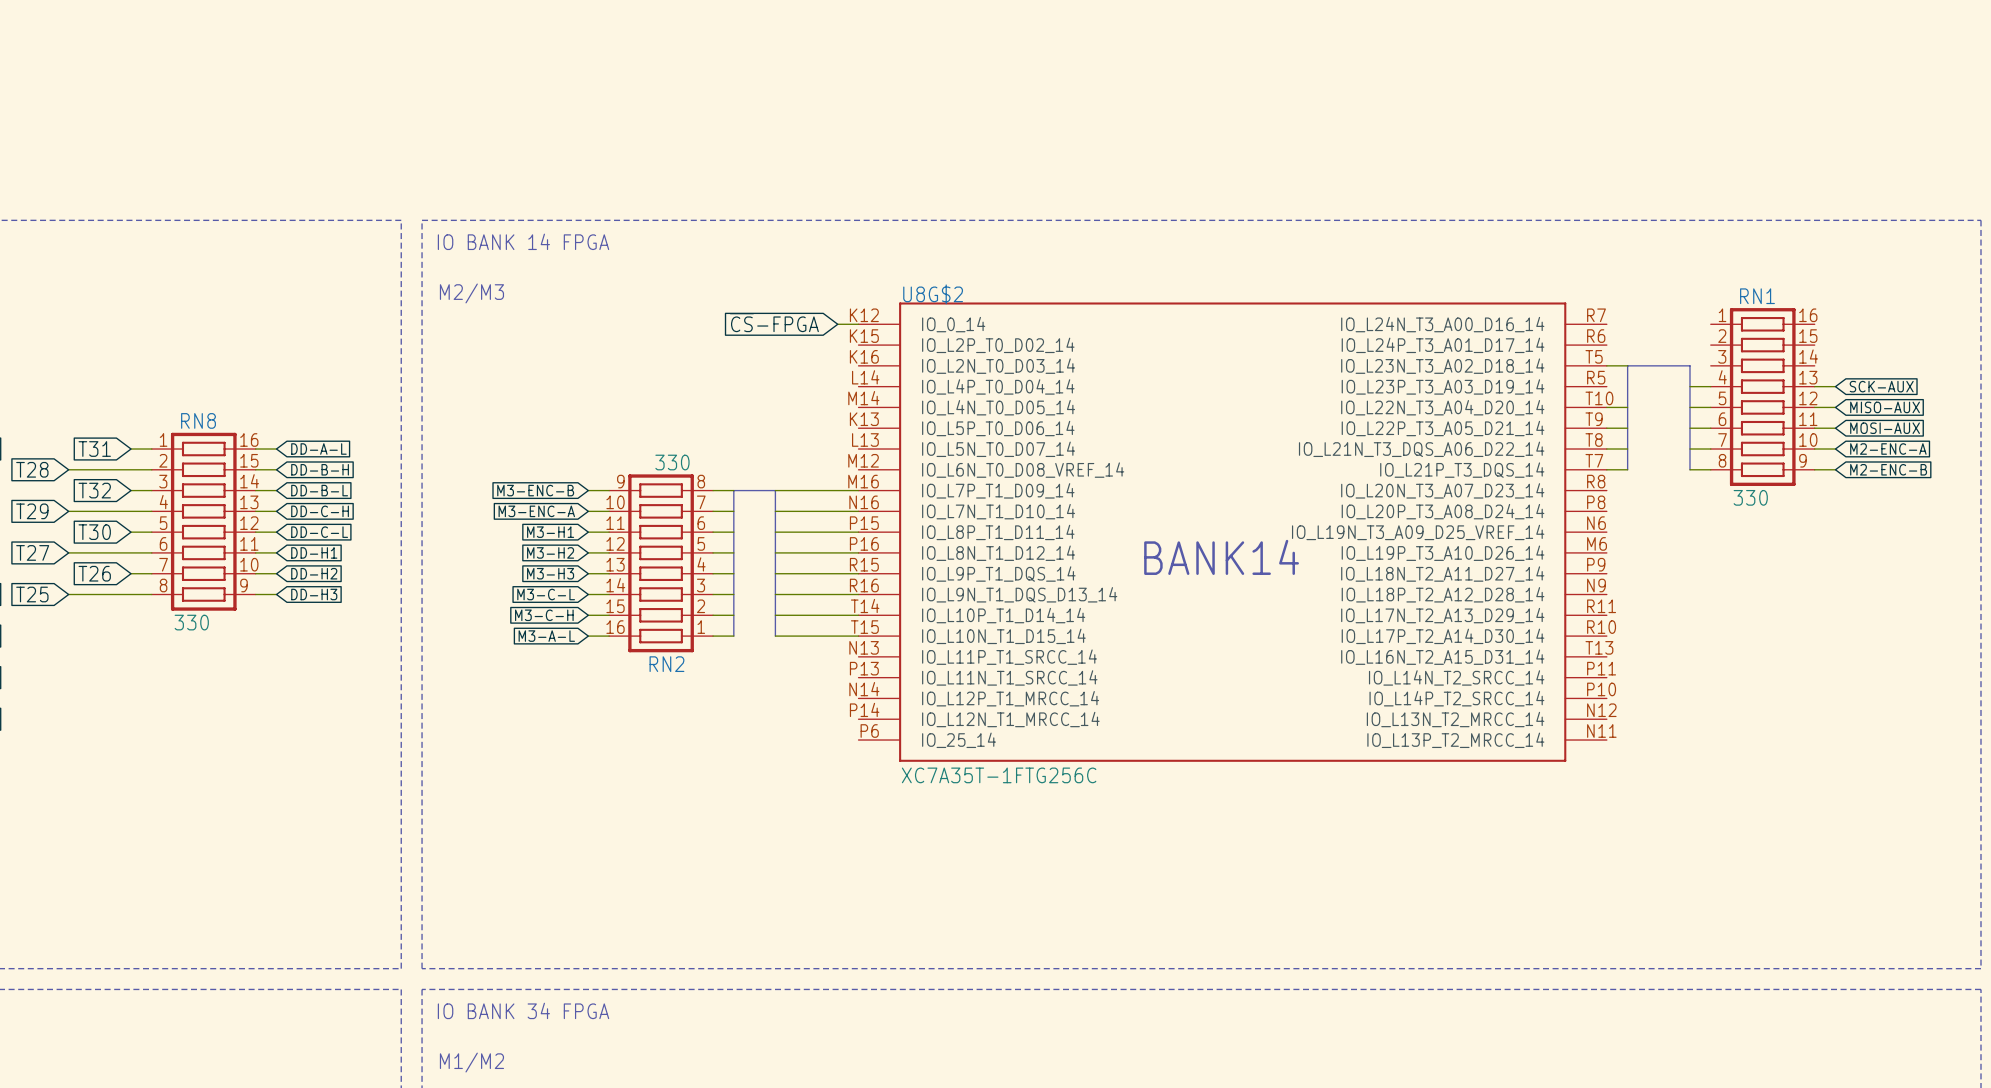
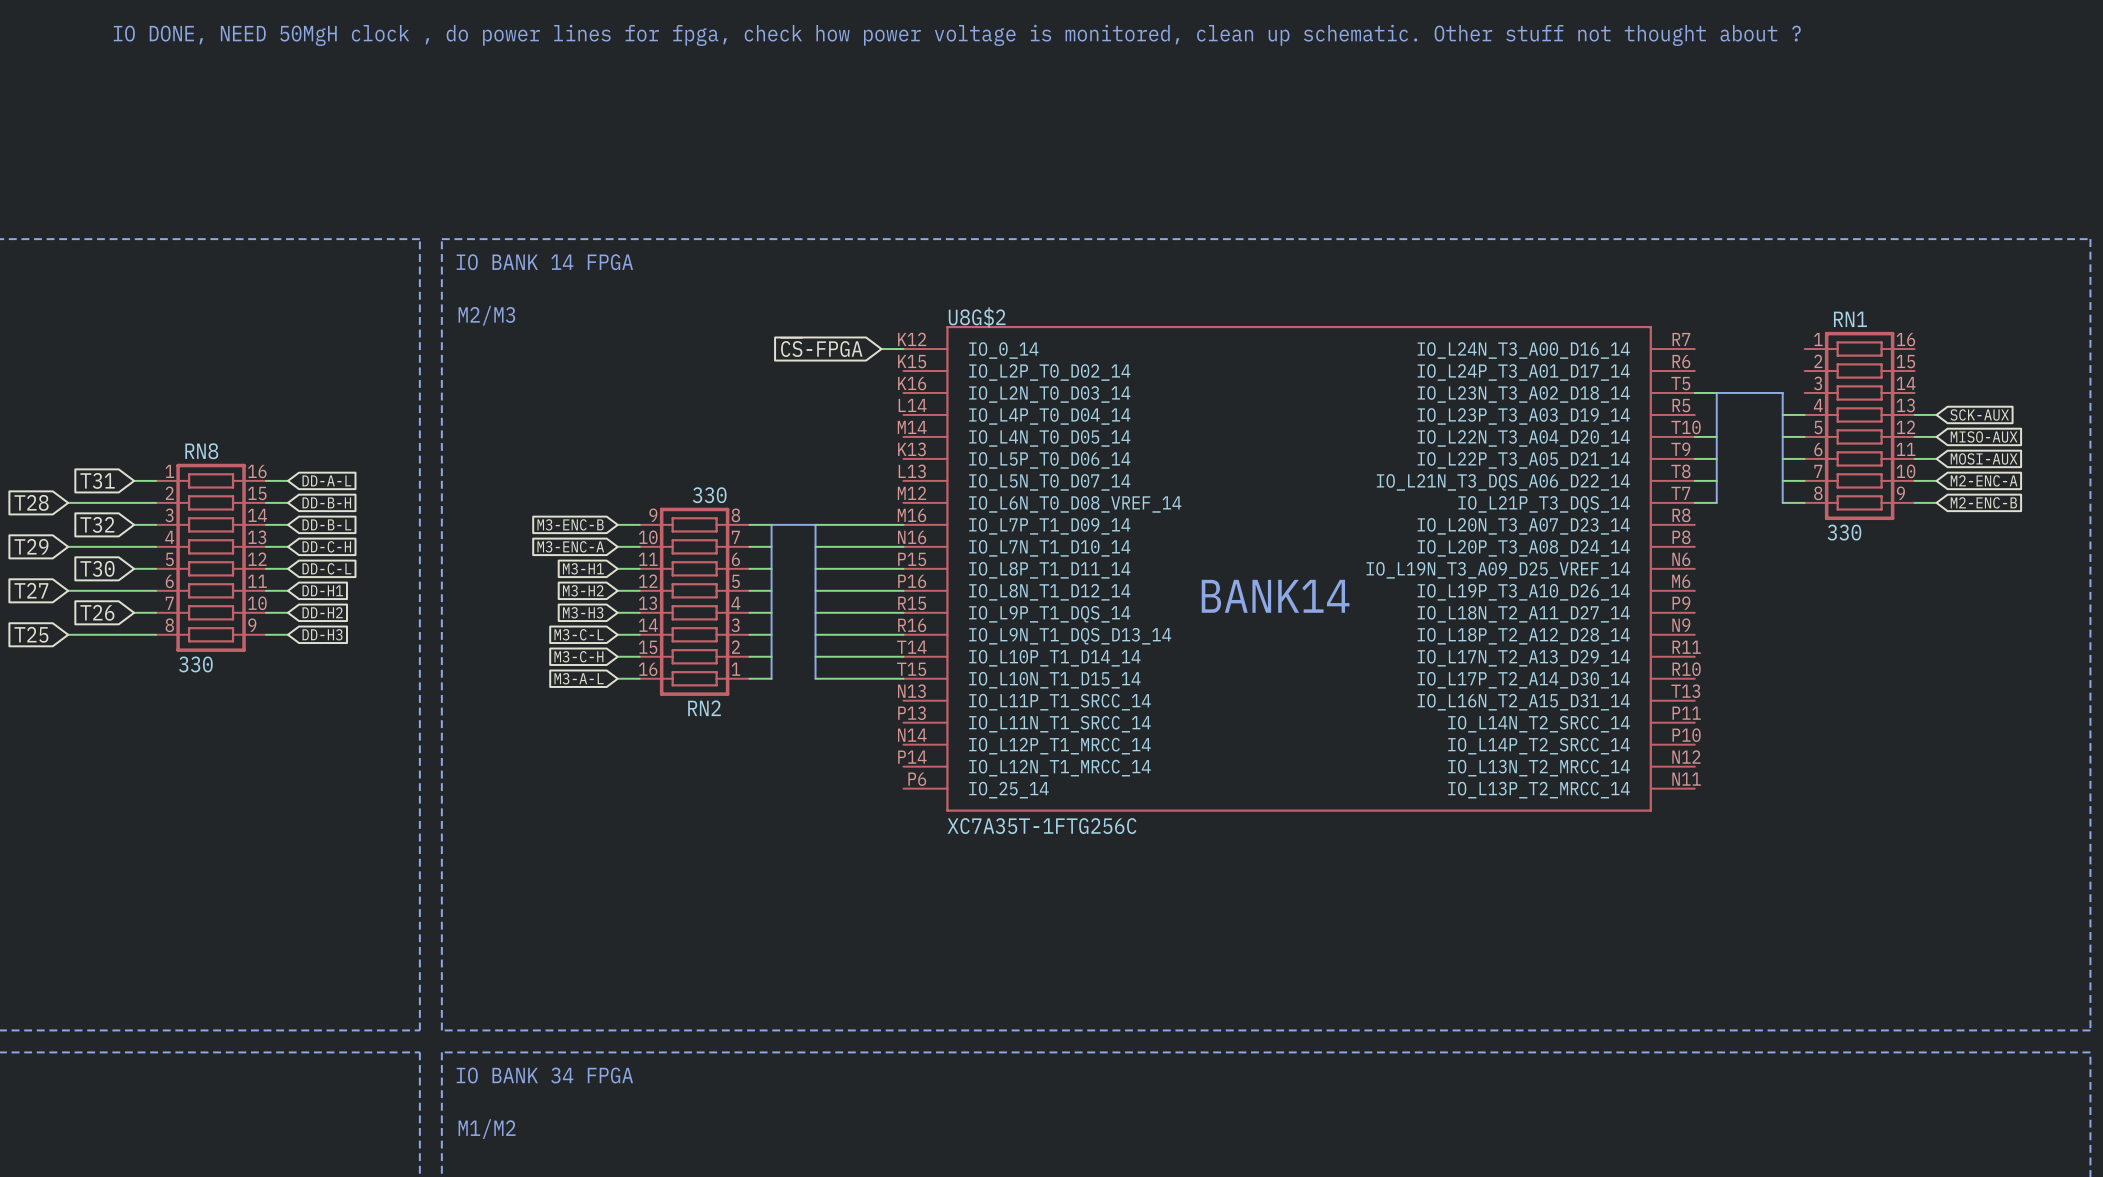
text: none -> IO DONE, NEED 50MgH clock , do power lines for fpga, check how power voltage is monitored, clean up schematic. Other stuff not thought about ? (957, 35)

